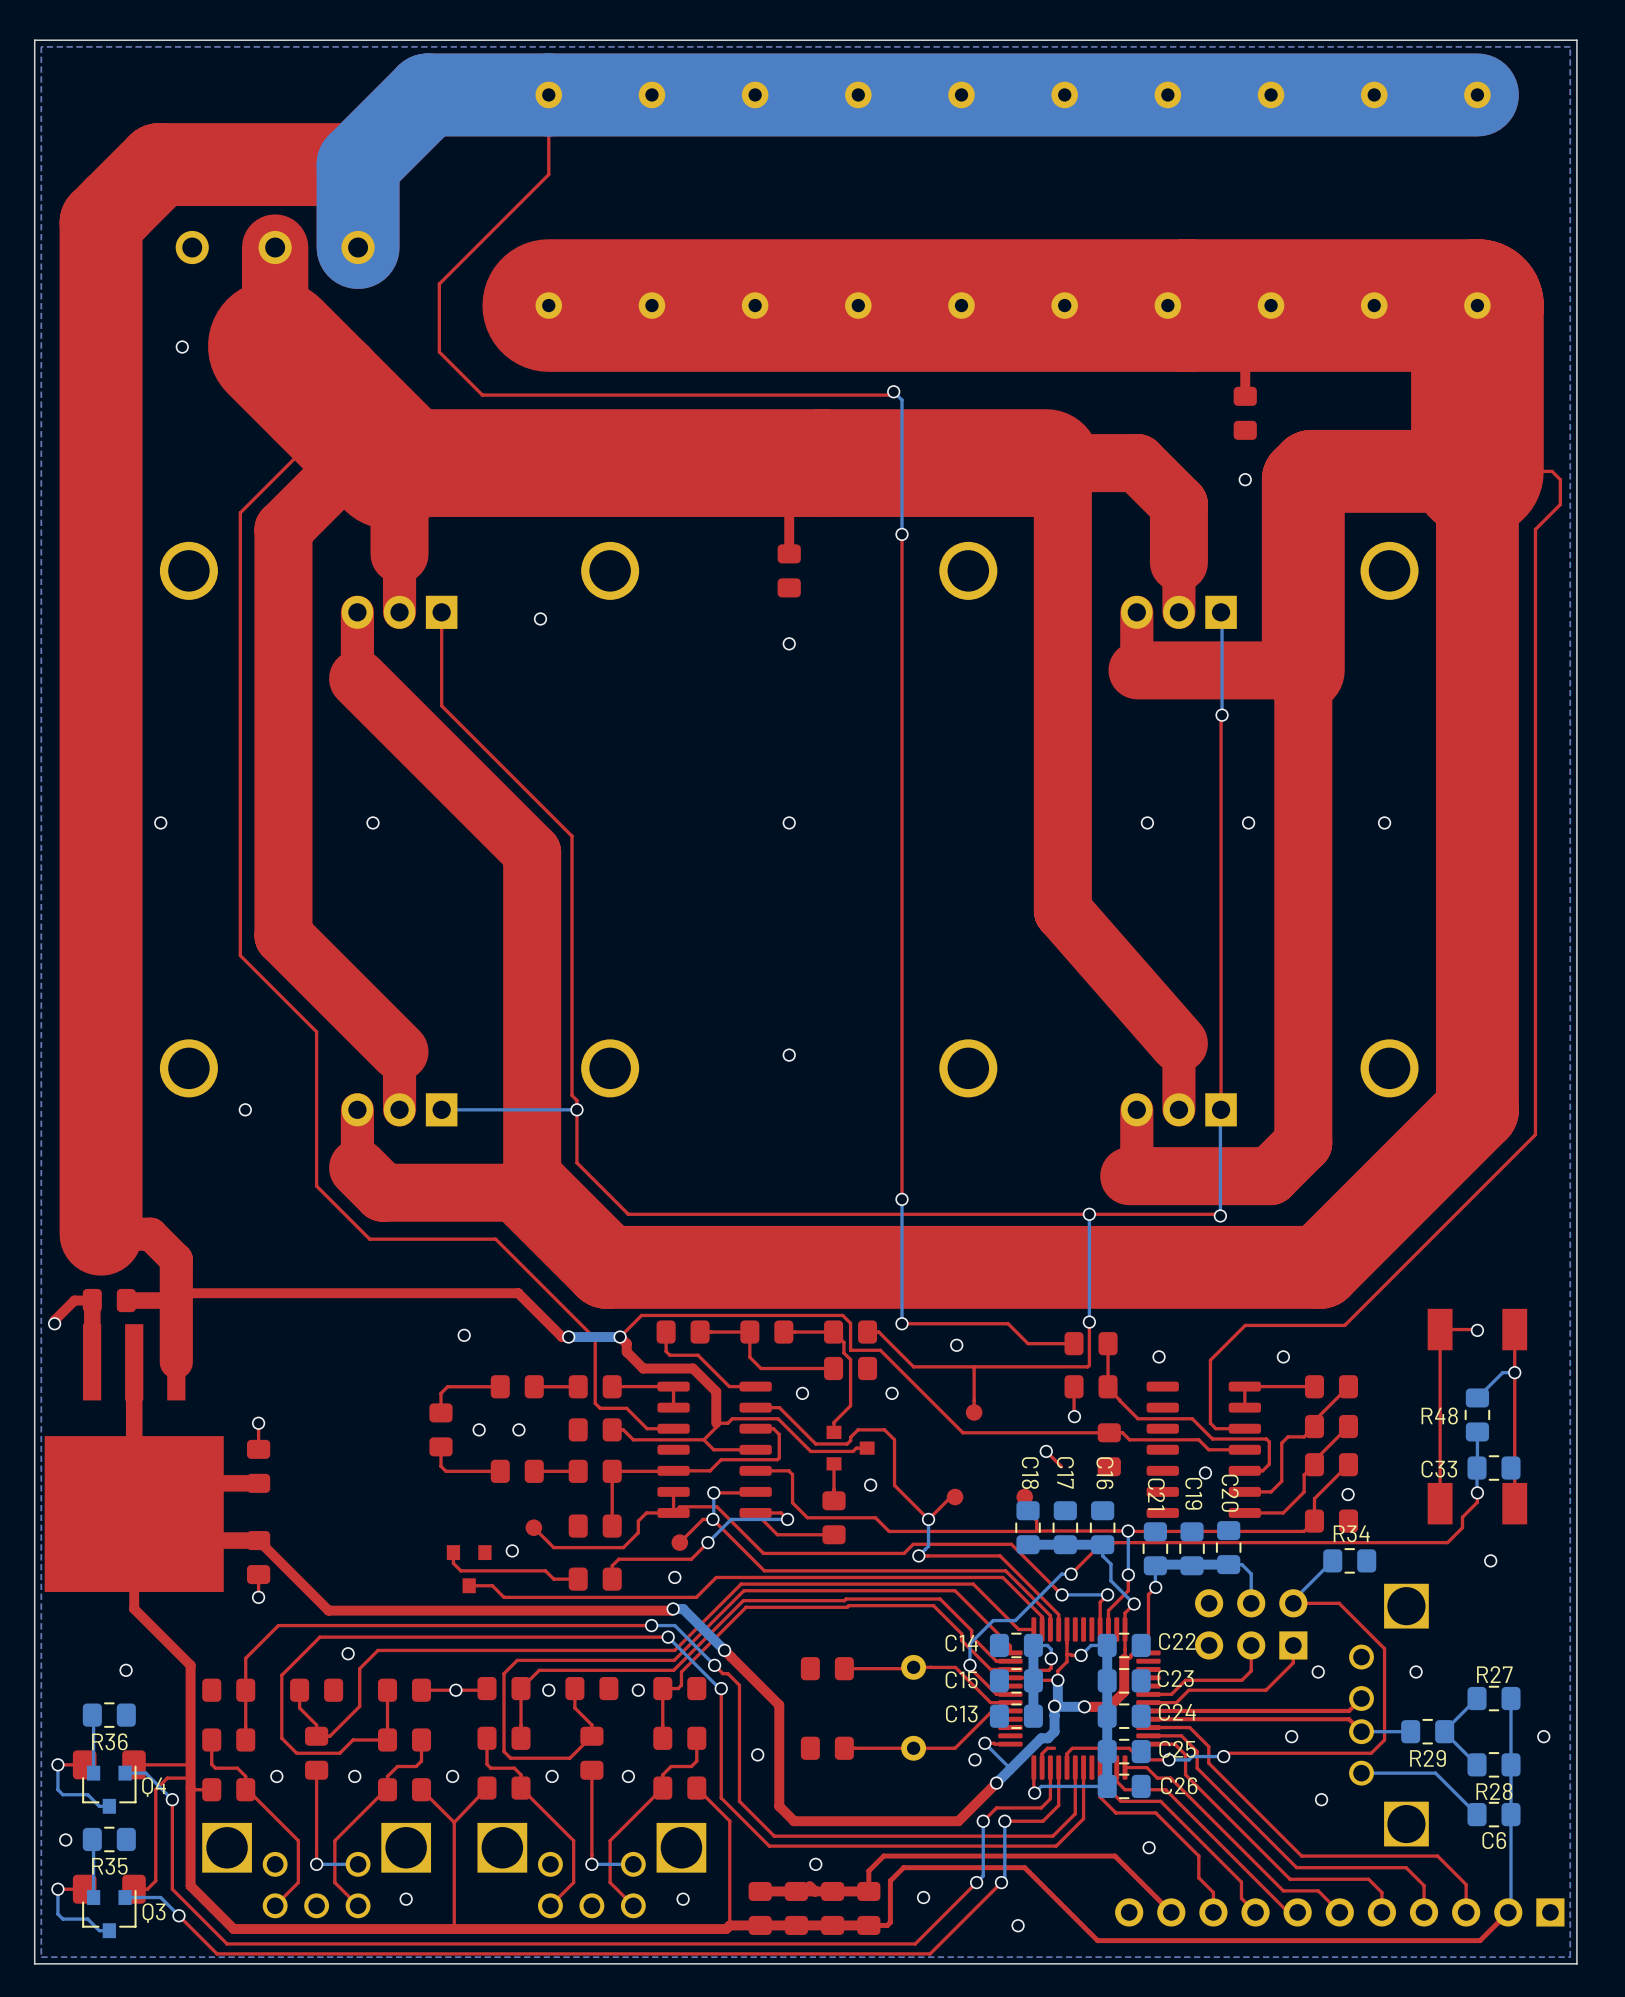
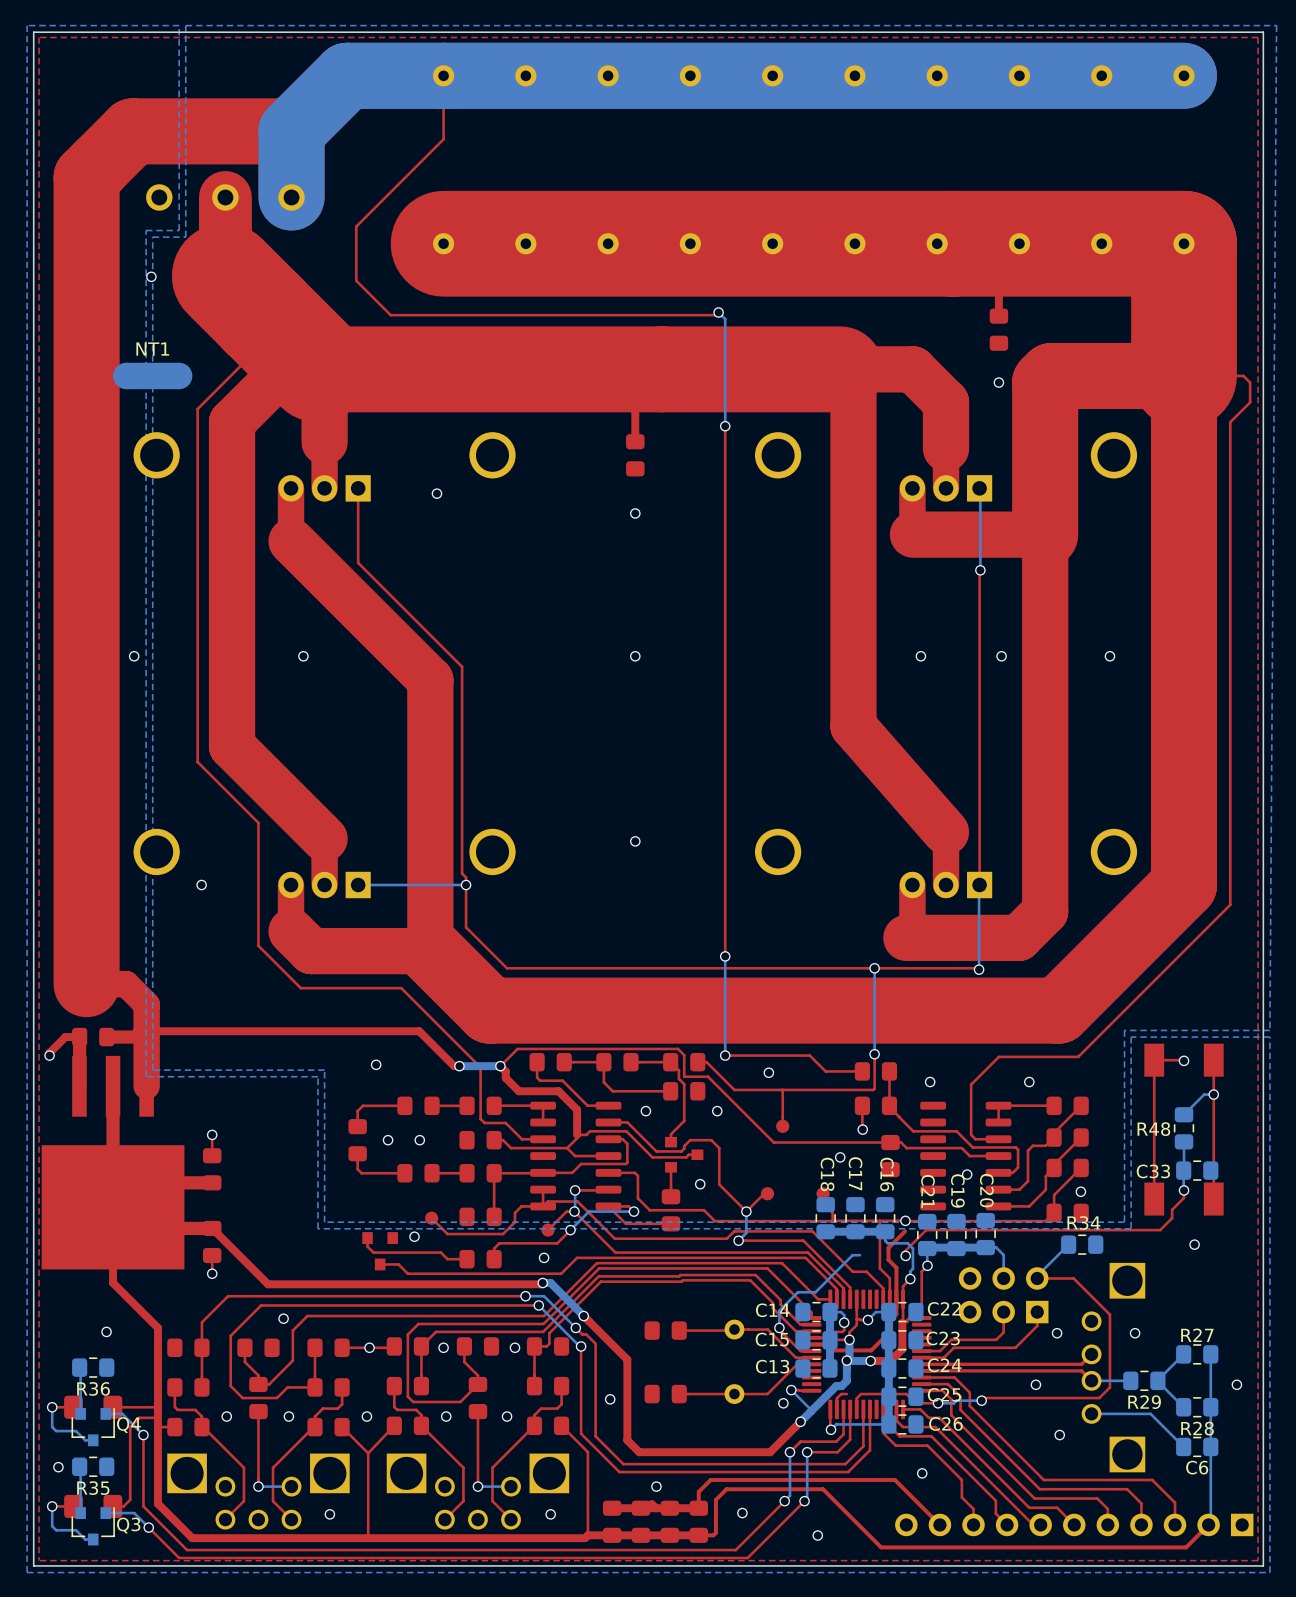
bottom zone outline: none -> (179, 25) (27, 25) (27, 1572) (1269, 1572) (1269, 1037) (1131, 1037) (1131, 1228) (317, 1228) (317, 1076) (146, 1076) (146, 230) (179, 230) (179, 25)
bottom zone outline: (1570, 46) (1570, 1957) (41, 1957) (41, 46) (1570, 46) -> (1276, 25) (1269, 1030) (1124, 1030) (1124, 1222) (324, 1222) (324, 1070) (152, 1070) (152, 237) (185, 237) (185, 25) (1276, 25)
NT1: none -> (152, 375)
top track: (1046, 1451) (1061, 1466) -> none
bottom track: (1128, 1531) (1128, 1574) -> none
top track: (1154, 1542) (1102, 1542) (1071, 1574) -> (926, 1230) (902, 1253)
top track: none -> (905, 1231) (888, 1247) (888, 1259) (896, 1267) (896, 1314) (891, 1319) (891, 1330) (871, 1350) (833, 1350) (827, 1344) (811, 1344)
bottom track: (1105, 1559) (1110, 1564) (1110, 1580) (1134, 1604) -> (887, 1243) (907, 1243) (912, 1248) (912, 1268) (910, 1271) (910, 1279)
via: (1071, 1574) -> none
top track: (1128, 1574) (1128, 1590) (1108, 1610) -> (879, 1220) (879, 1268) (889, 1278) (889, 1284)
via: (1062, 1594) -> none
top track: (1107, 1594) (1100, 1602) (1100, 1615) -> (852, 1271) (866, 1271) (883, 1288)
bottom track: (1107, 1594) (1062, 1594) -> none
via: (1107, 1594) -> none

